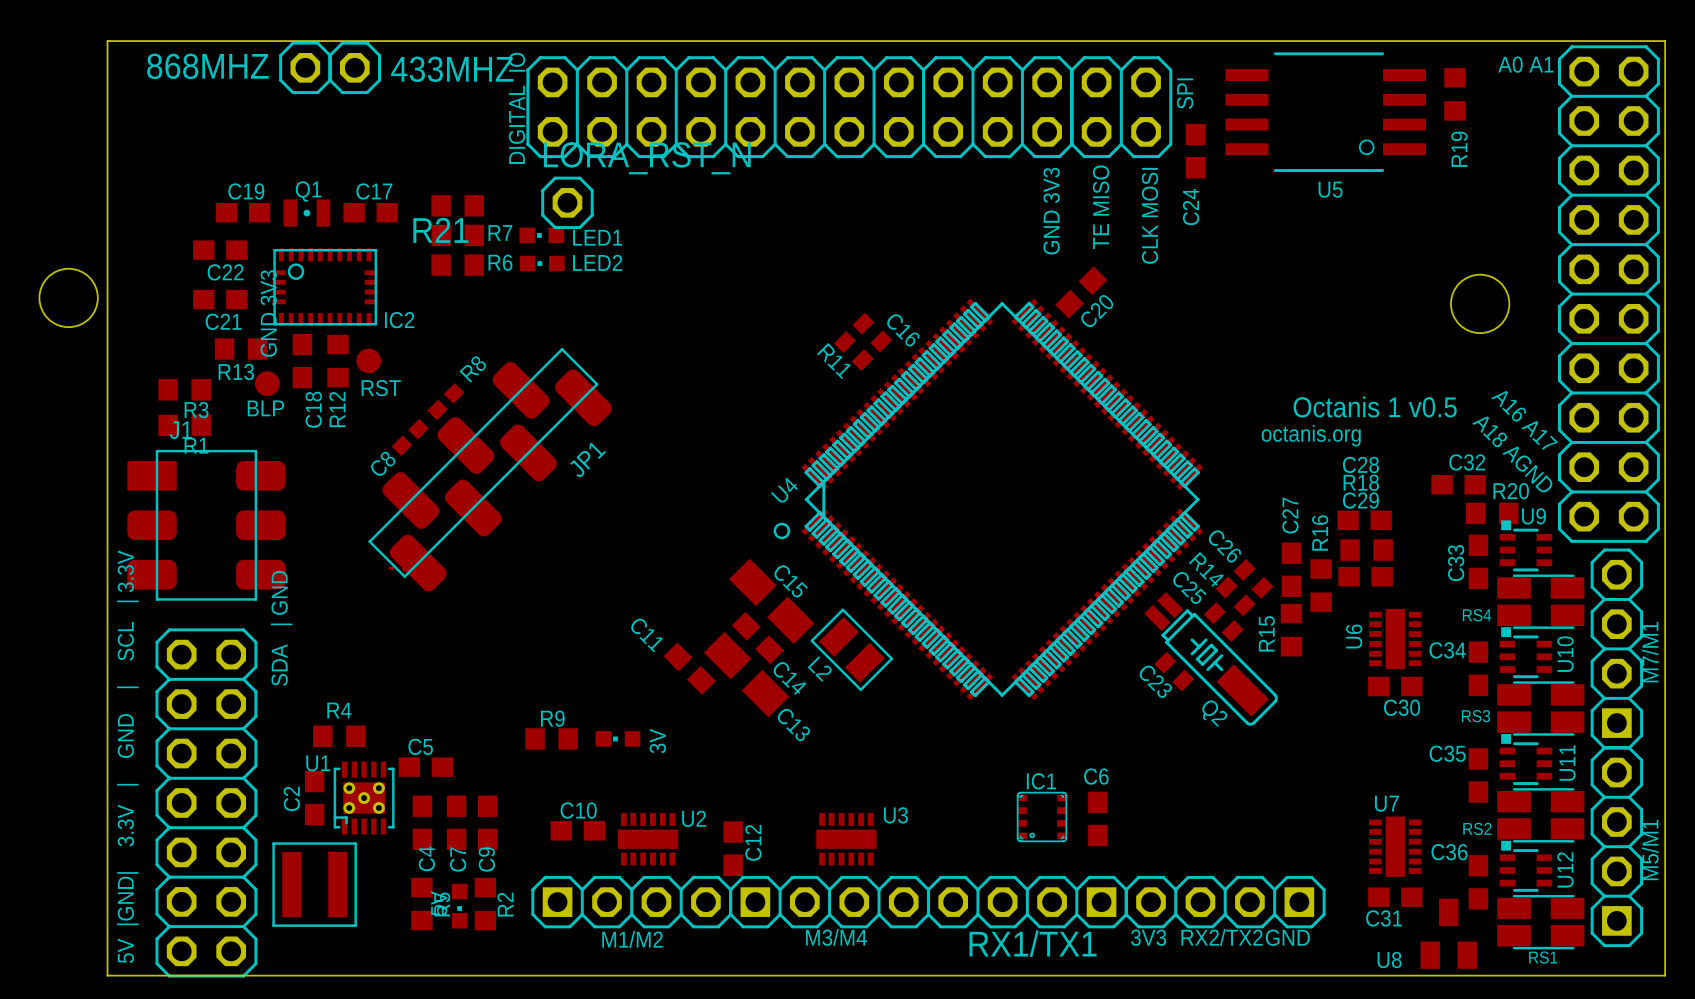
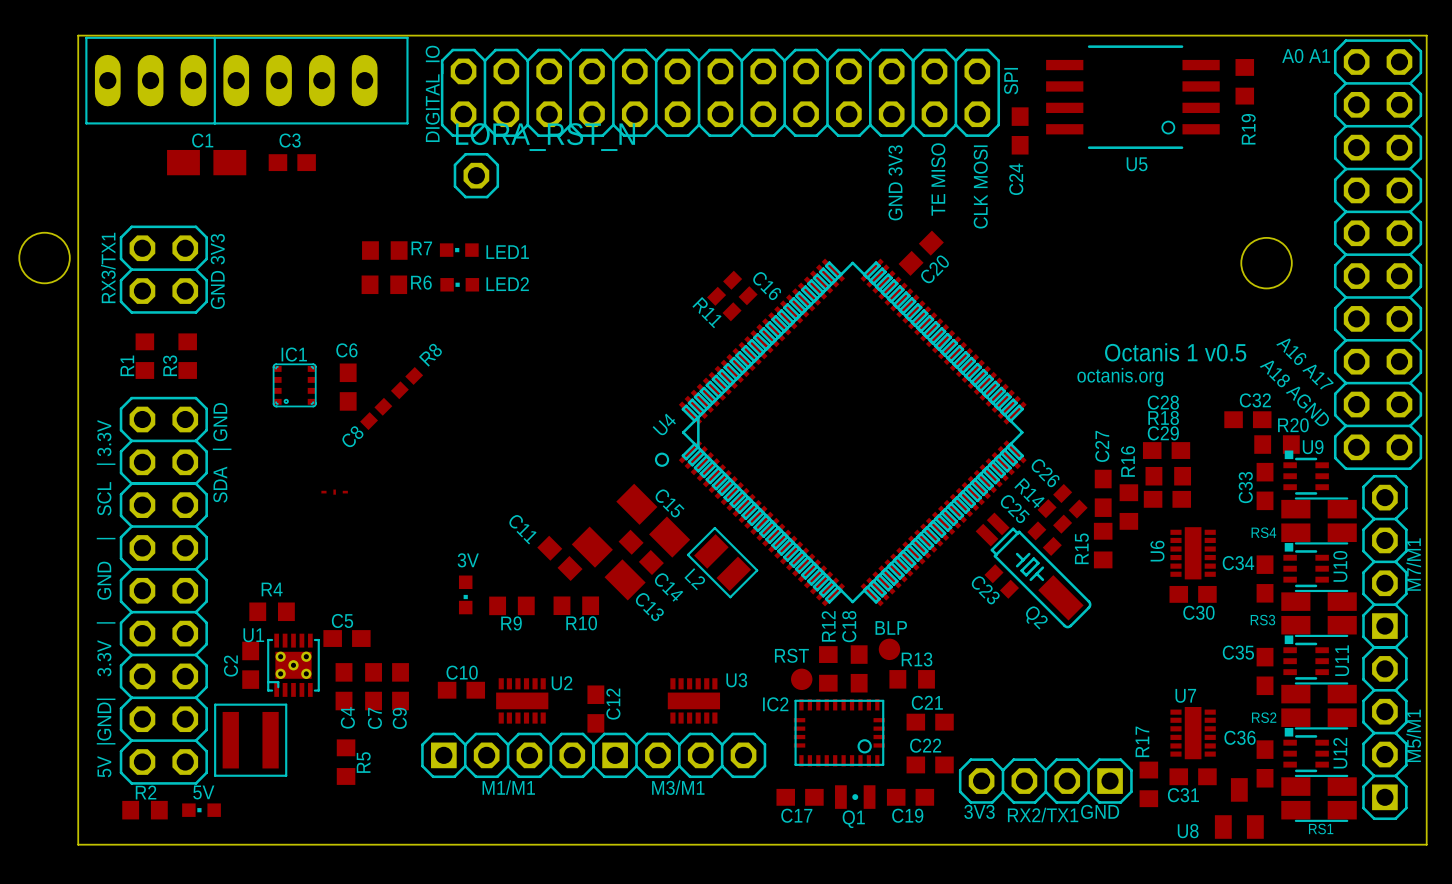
868MHZ: (305, 67) -> none
433MHZ: (354, 67) -> none
part: none -> (246, 80)
C1: none -> (206, 162)
C3: none -> (292, 162)
C19 name position: C19 (246, 191) -> C19 (907, 815)
Q1 name position: Q1 (308, 191) -> Q1 (853, 819)
C17 name position: C17 (374, 191) -> C17 (796, 815)
R21: (457, 205) -> none
C19 position: (243, 212) -> (910, 797)
C17 position: (370, 212) -> (800, 797)
Q1 position: (306, 213) -> (855, 797)
R7 position: (457, 235) -> (384, 250)
LED1 position: (541, 235) -> (459, 250)
C22 position: (220, 250) -> (930, 764)
LED2 position: (542, 263) -> (459, 284)
R6 position: (457, 265) -> (384, 284)
C22 name position: C22 (225, 272) -> C22 (925, 745)
IC2 rotation: 0° (325, 287) -> 180° (839, 732)
IC2 position: (325, 287) -> (839, 732)
C21 position: (220, 299) -> (930, 722)
RX3/TX1: none -> (163, 269)
C21 name position: C21 (223, 321) -> C21 (927, 702)
R13 position: (241, 349) -> (912, 679)
RST: (368, 360) -> none
C18 position: (302, 361) -> (859, 668)
R12 position: (337, 361) -> (828, 668)
R13 name position: R13 (236, 371) -> R13 (917, 659)
BLP: (267, 383) -> none
R3 rotation: 0° (184, 389) -> 90° clockwise (187, 356)
R3 position: (184, 389) -> (187, 356)
R8 position: (445, 401) -> (407, 383)
C18 name position: C18 (313, 409) -> C18 (849, 626)
R12 name position: R12 (337, 409) -> R12 (828, 626)
R1 rotation: 0° (184, 425) -> 90° clockwise (144, 356)
C8 position: (410, 437) -> (376, 413)
JP1: (490, 469) -> none
part: none -> (163, 440)
J1: (206, 525) -> none
text position: SDA | GND (281, 628) -> SDA | GND (222, 452)
C11 position: (689, 668) -> (559, 558)
C13 position: (746, 674) -> (608, 563)
R10: none -> (576, 605)
R9 name position: R9 (552, 718) -> R9 (511, 623)
R4 position: (339, 736) -> (272, 611)
R9 position: (551, 738) -> (511, 605)
3V rotation: 0° (617, 738) -> 90° counterclockwise (465, 594)
3V position: (617, 738) -> (465, 594)
BLP: none -> (889, 649)
text position: 5V |GND| 3.3V | GND | SCL | 3.3V (127, 756) -> 5V |GND| 3.3V | GND | SCL | 3.3V (106, 598)
C5 position: (425, 767) -> (347, 638)
RST: none -> (801, 679)
C2 position: (314, 798) -> (250, 665)
U1 position: (364, 798) -> (293, 665)
part position: (206, 802) -> (163, 633)
IC1 position: (1041, 816) -> (294, 385)
C6 position: (1097, 818) -> (348, 387)
C4 position: (422, 822) -> (344, 686)
C7 position: (456, 822) -> (373, 686)
C9 position: (487, 822) -> (400, 686)
C10 position: (577, 830) -> (461, 690)
U2 position: (648, 839) -> (522, 700)
U3 position: (846, 839) -> (693, 700)
C12 position: (733, 848) -> (595, 709)
M1/M1: none -> (508, 755)
M3/M1: none -> (679, 755)
part position: (314, 884) -> (250, 740)
M1/M2: (631, 902) -> none
M3/M4: (829, 902) -> none
RX1/TX1: (1027, 902) -> none
R5 position: (421, 904) -> (346, 762)
R2 rotation: 0° (485, 904) -> 90° clockwise (145, 810)
R2 position: (485, 904) -> (145, 810)
R17: none -> (1148, 784)
5V rotation: 0° (459, 906) -> 90° clockwise (201, 810)
5V position: (459, 906) -> (201, 810)
RX2/TX2 name: RX2/TX2 (1222, 937) -> RX2/TX1 (1043, 815)

